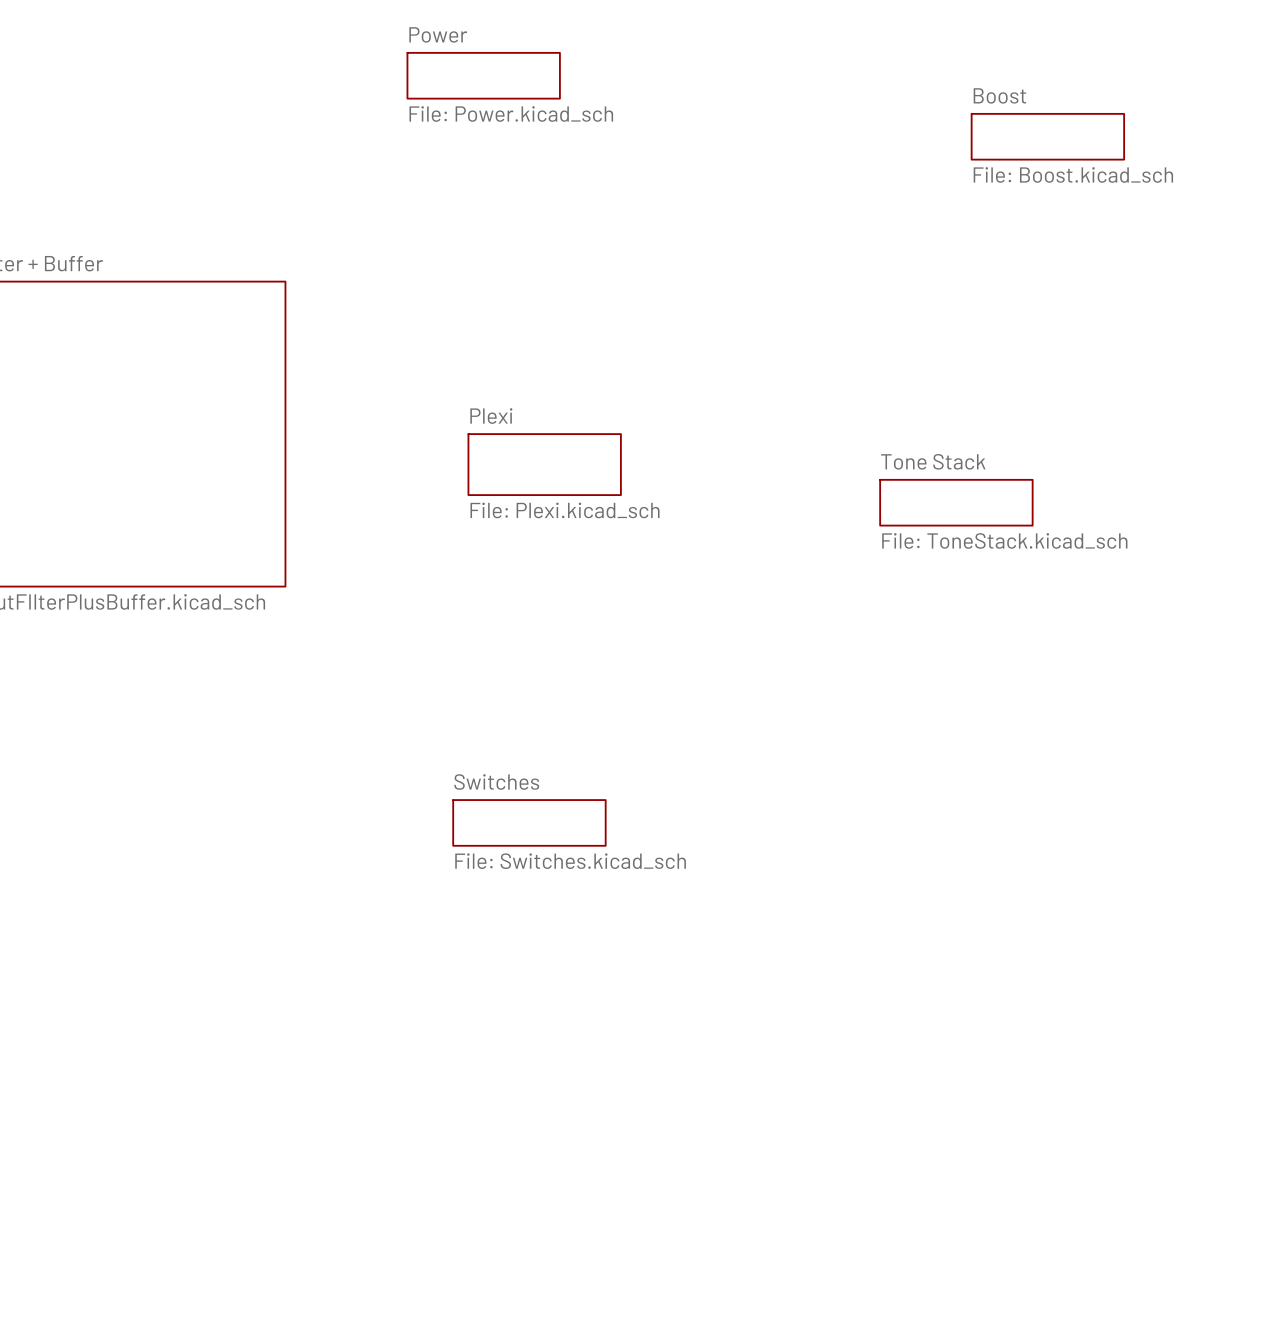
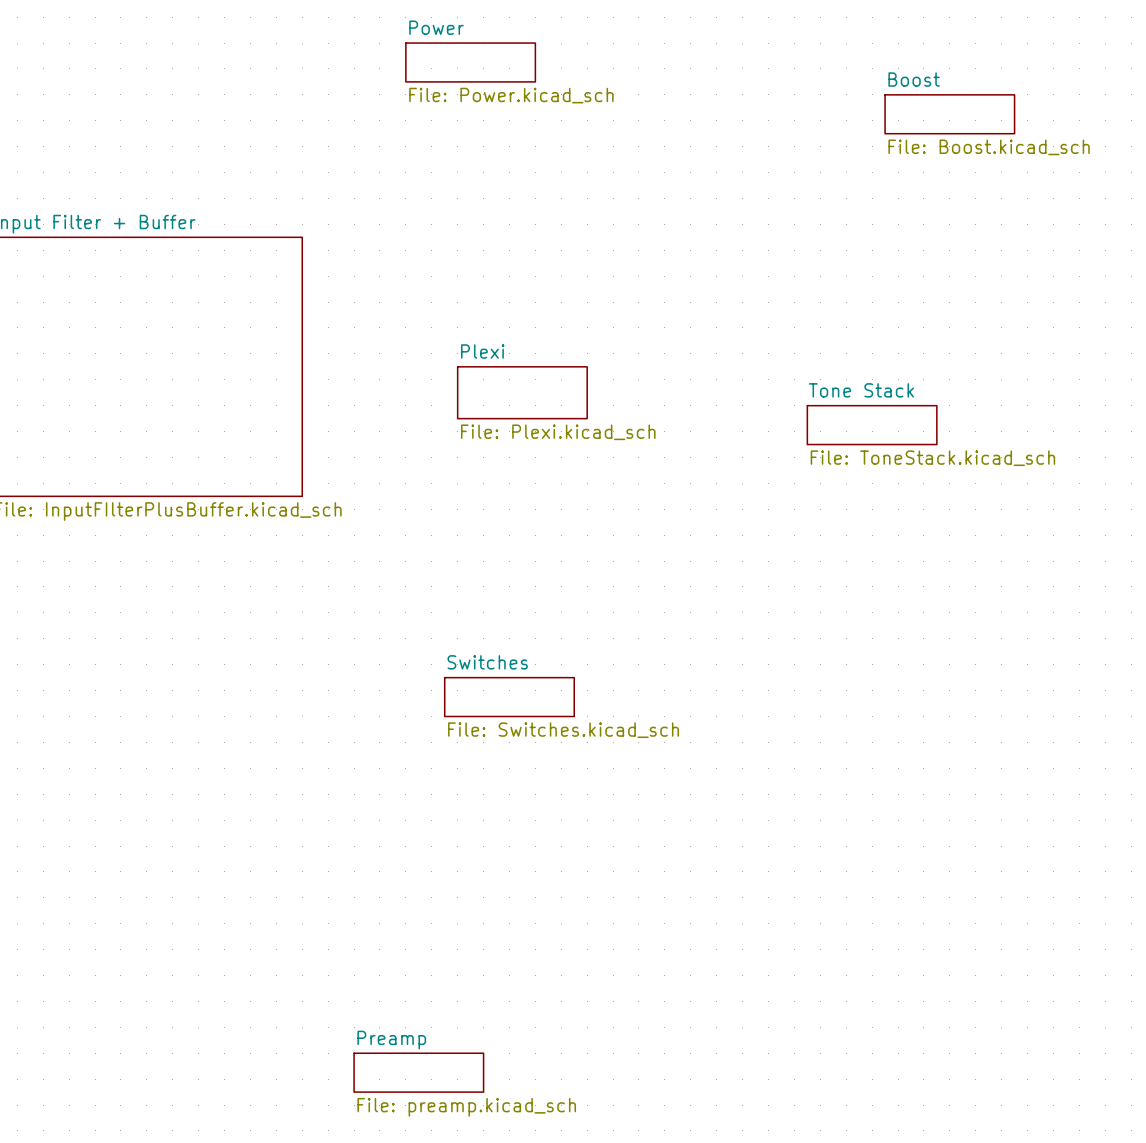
sheet Preamp: none -> File: preamp.kicad_sch (418, 1072)

